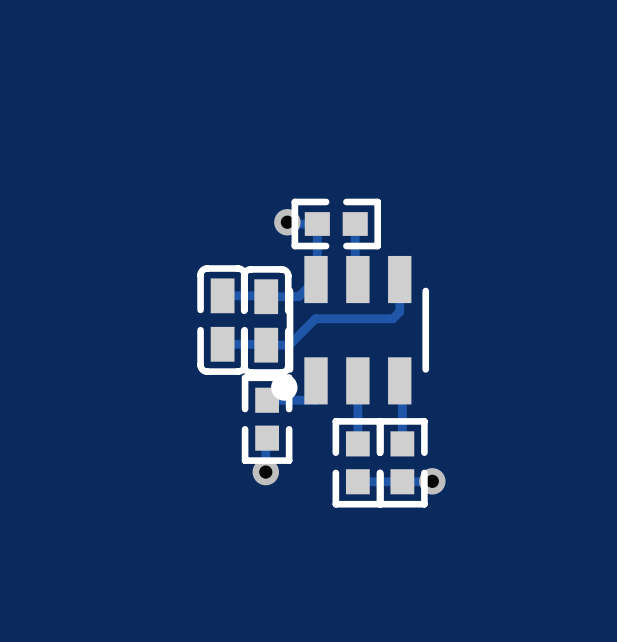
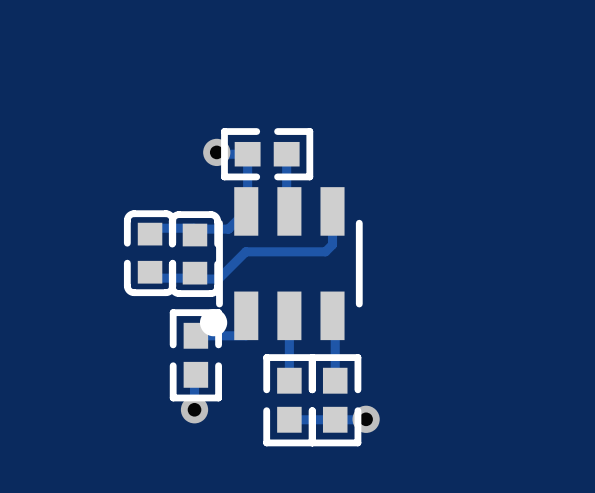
part footprint: [197, 265, 248, 375] -> [123, 210, 177, 297]
part footprint: [240, 266, 292, 376] -> [168, 211, 222, 297]

